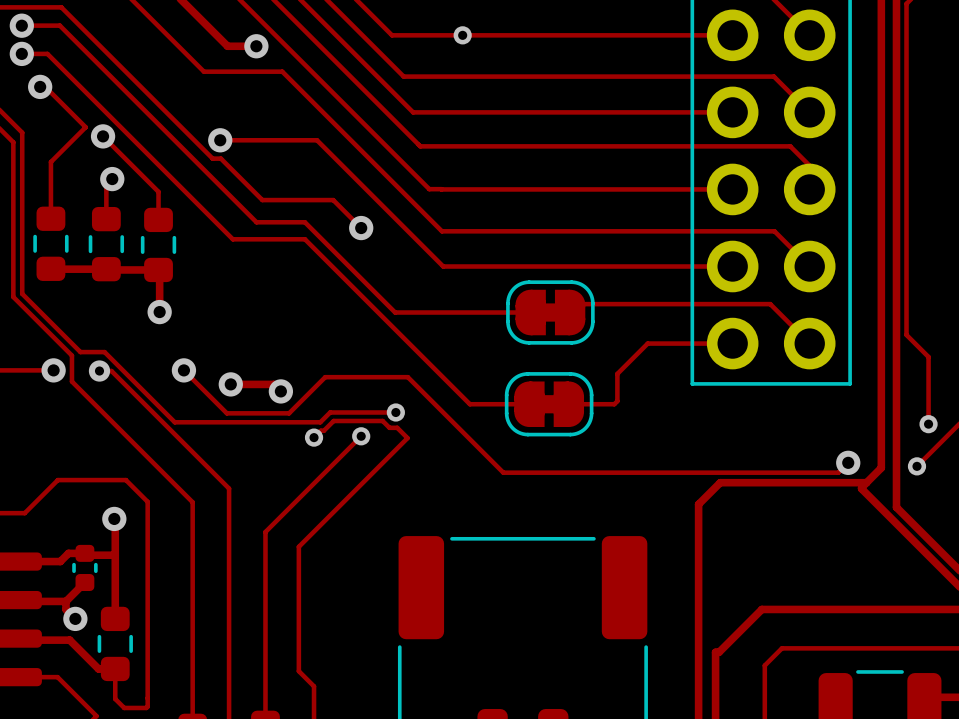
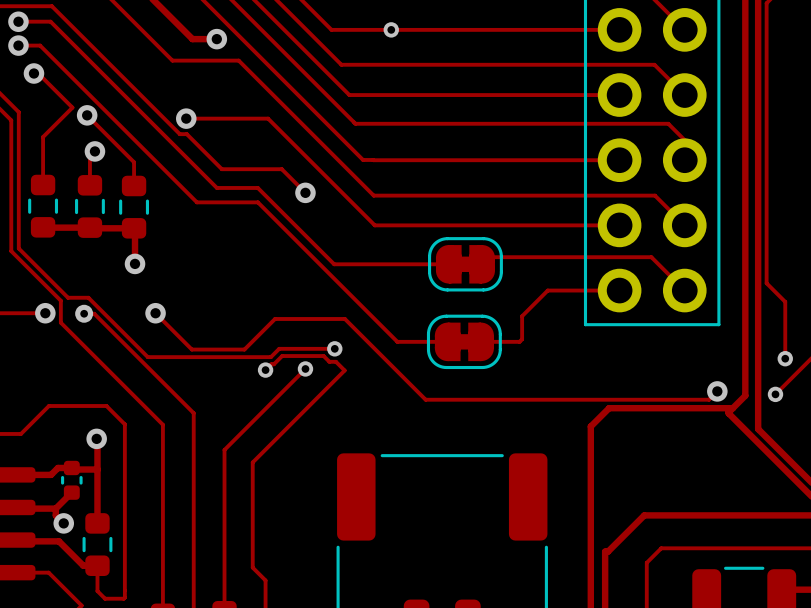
track: (230, 384) (273, 384) (280, 391) -> none
via: (230, 384) -> none
via: (280, 391) -> none

